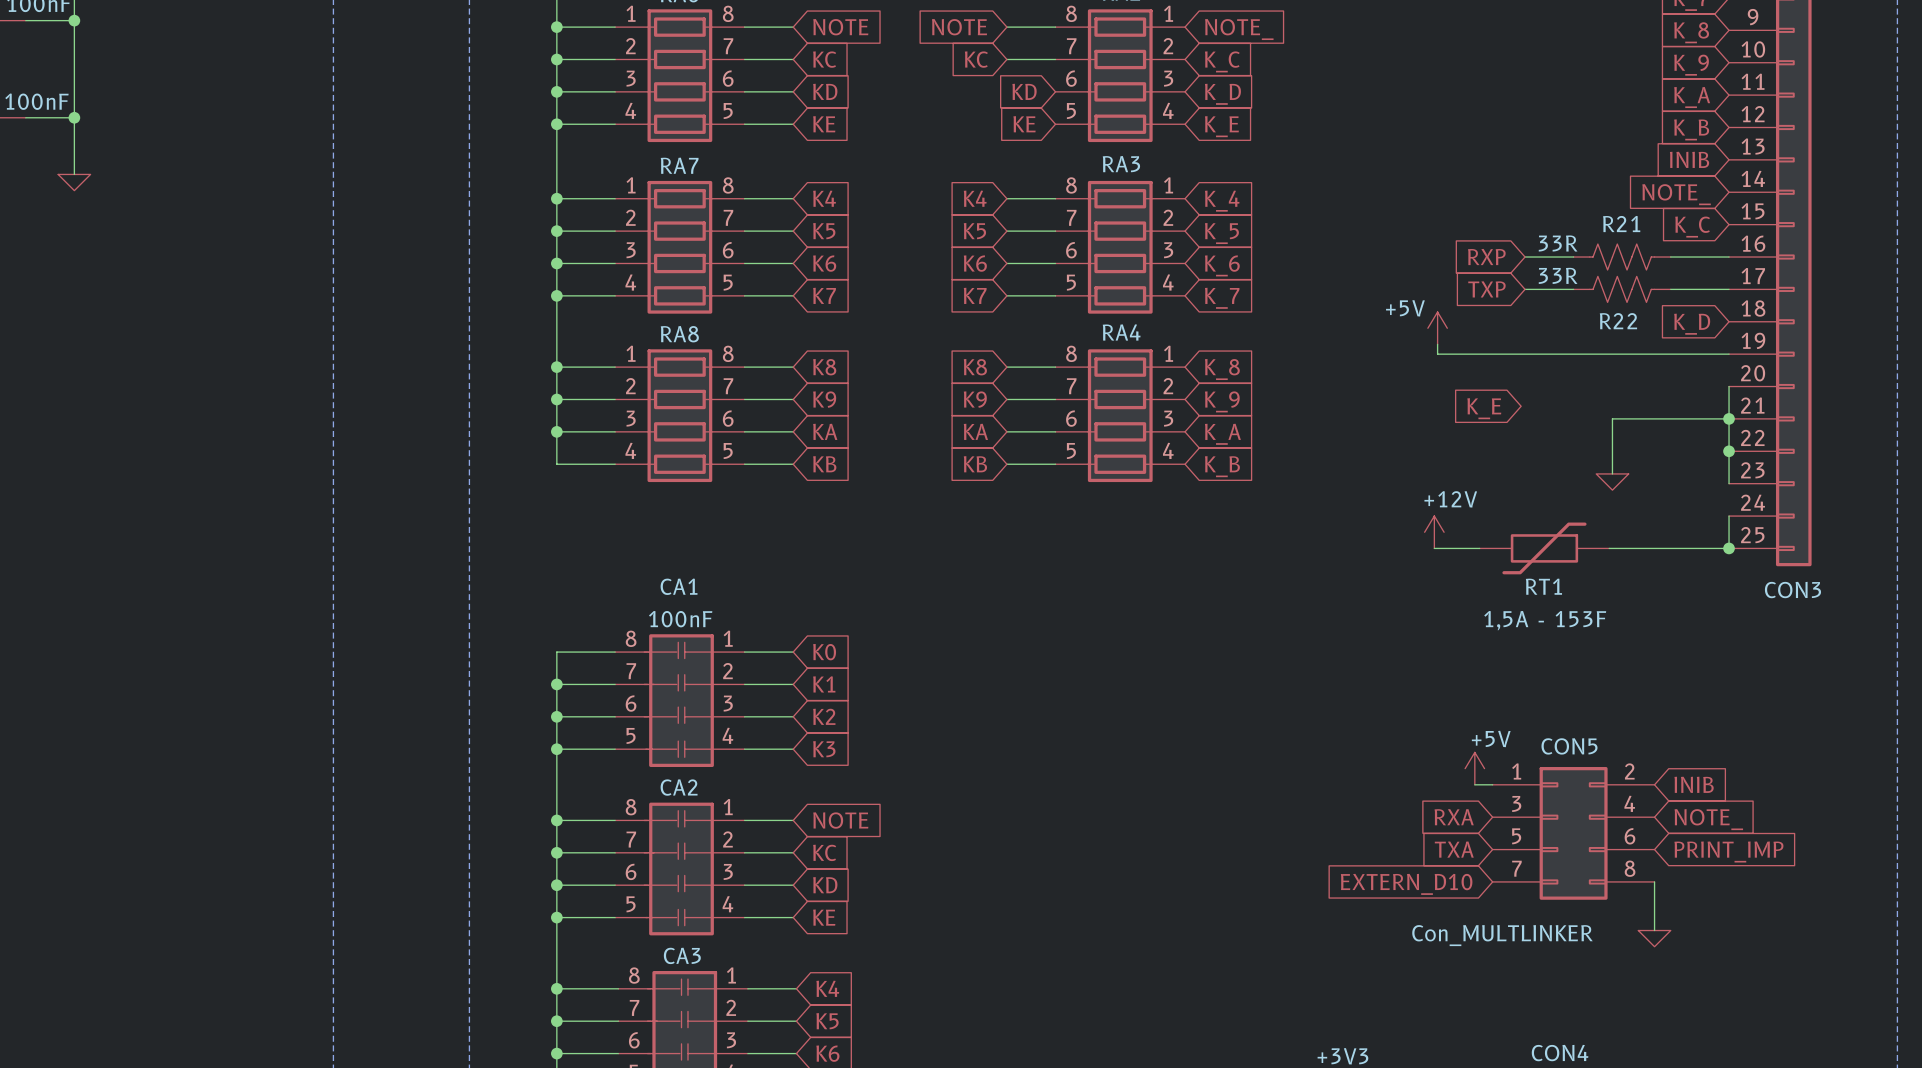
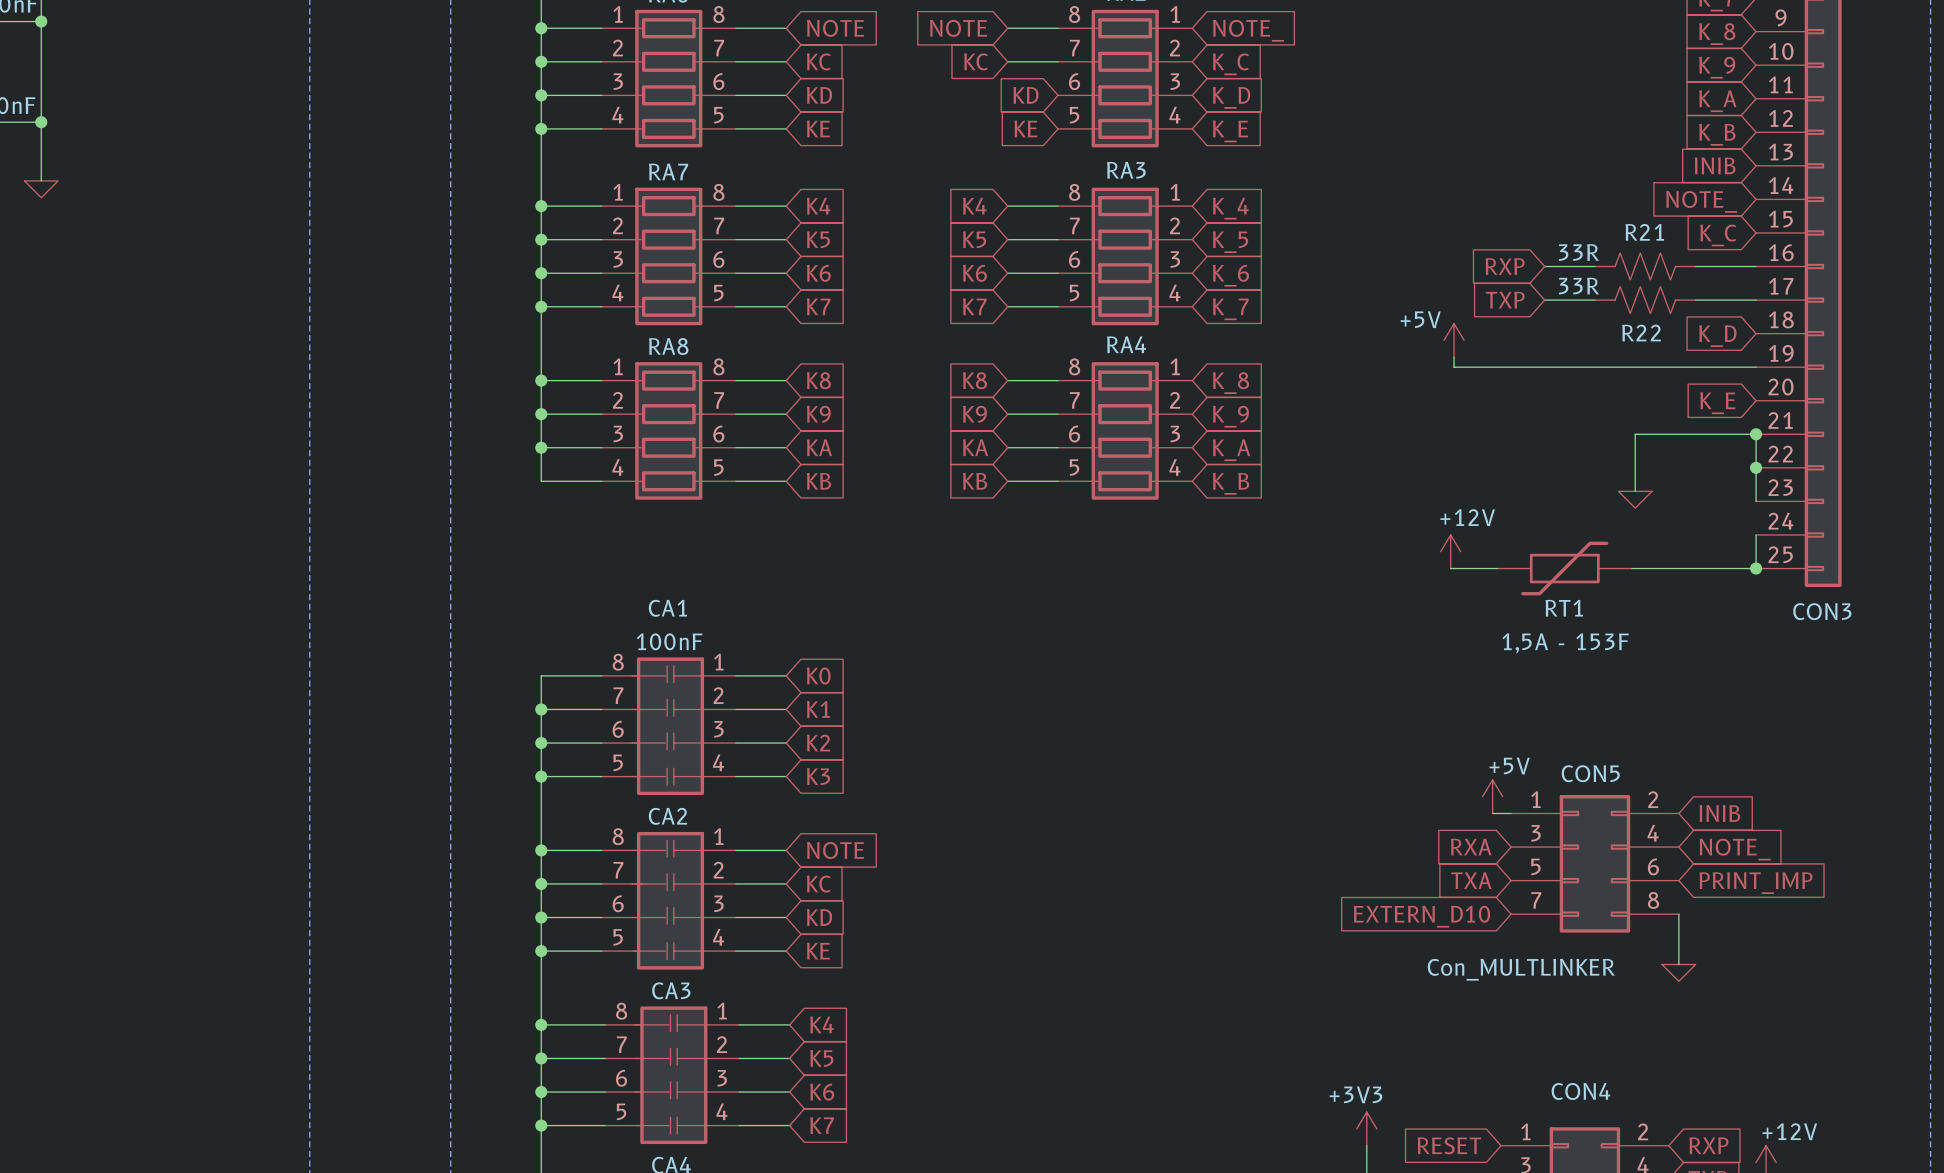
wire: (1729, 386) (1729, 418) -> none
global label position: K_E (1484, 408) -> K_E (1717, 403)

